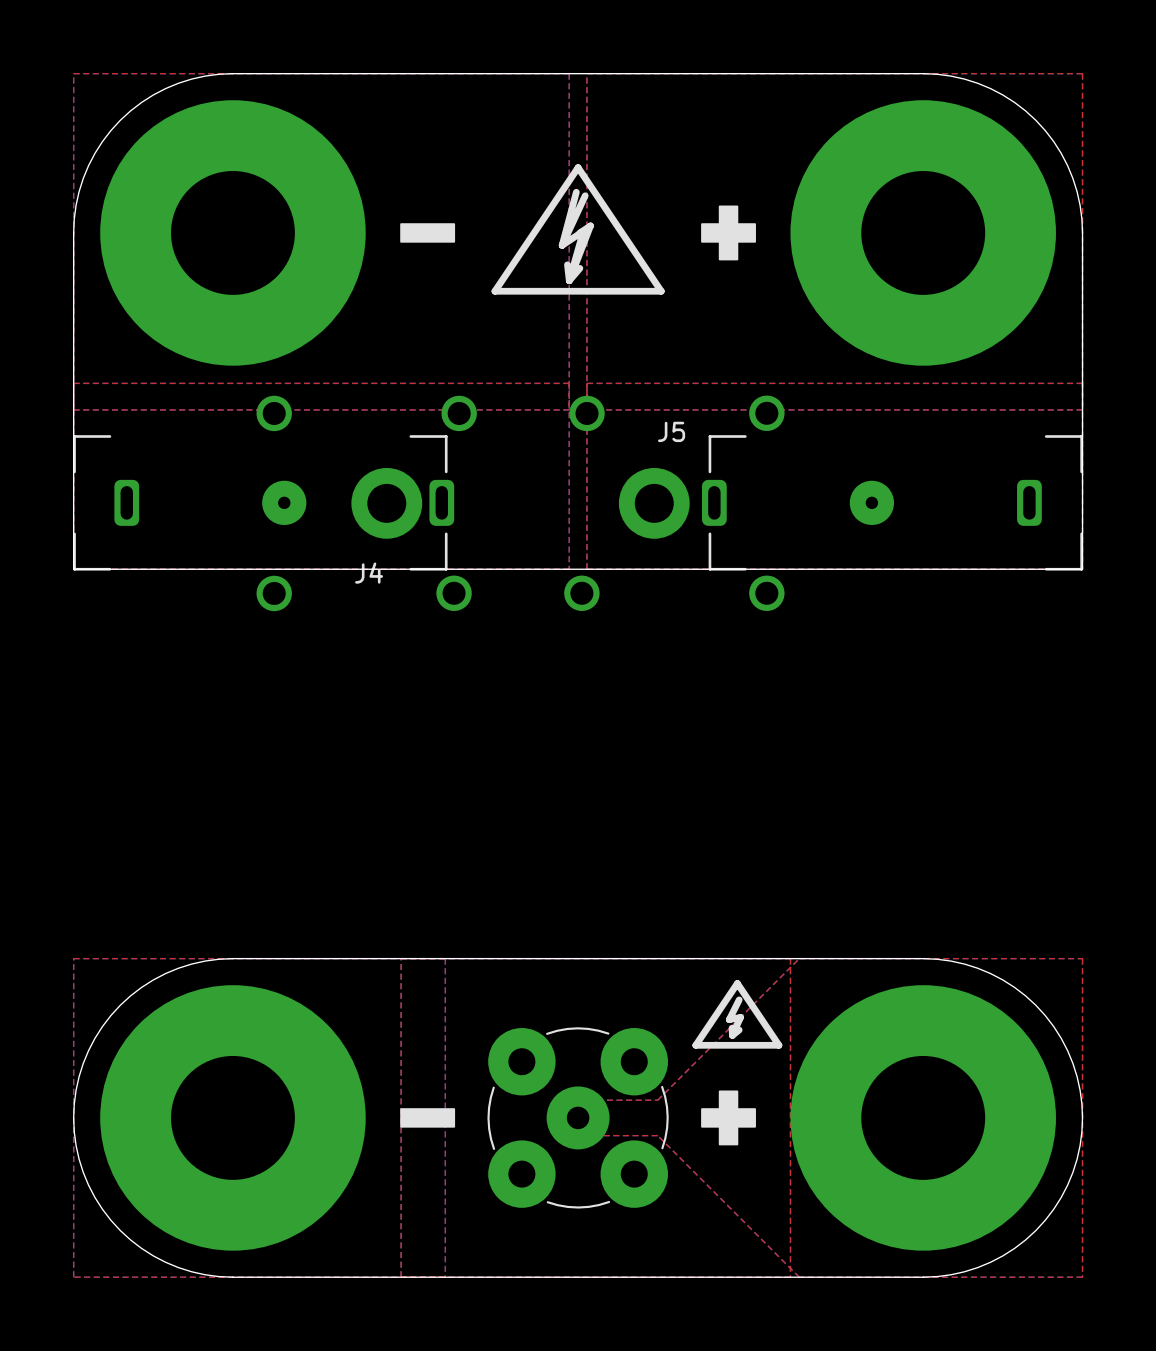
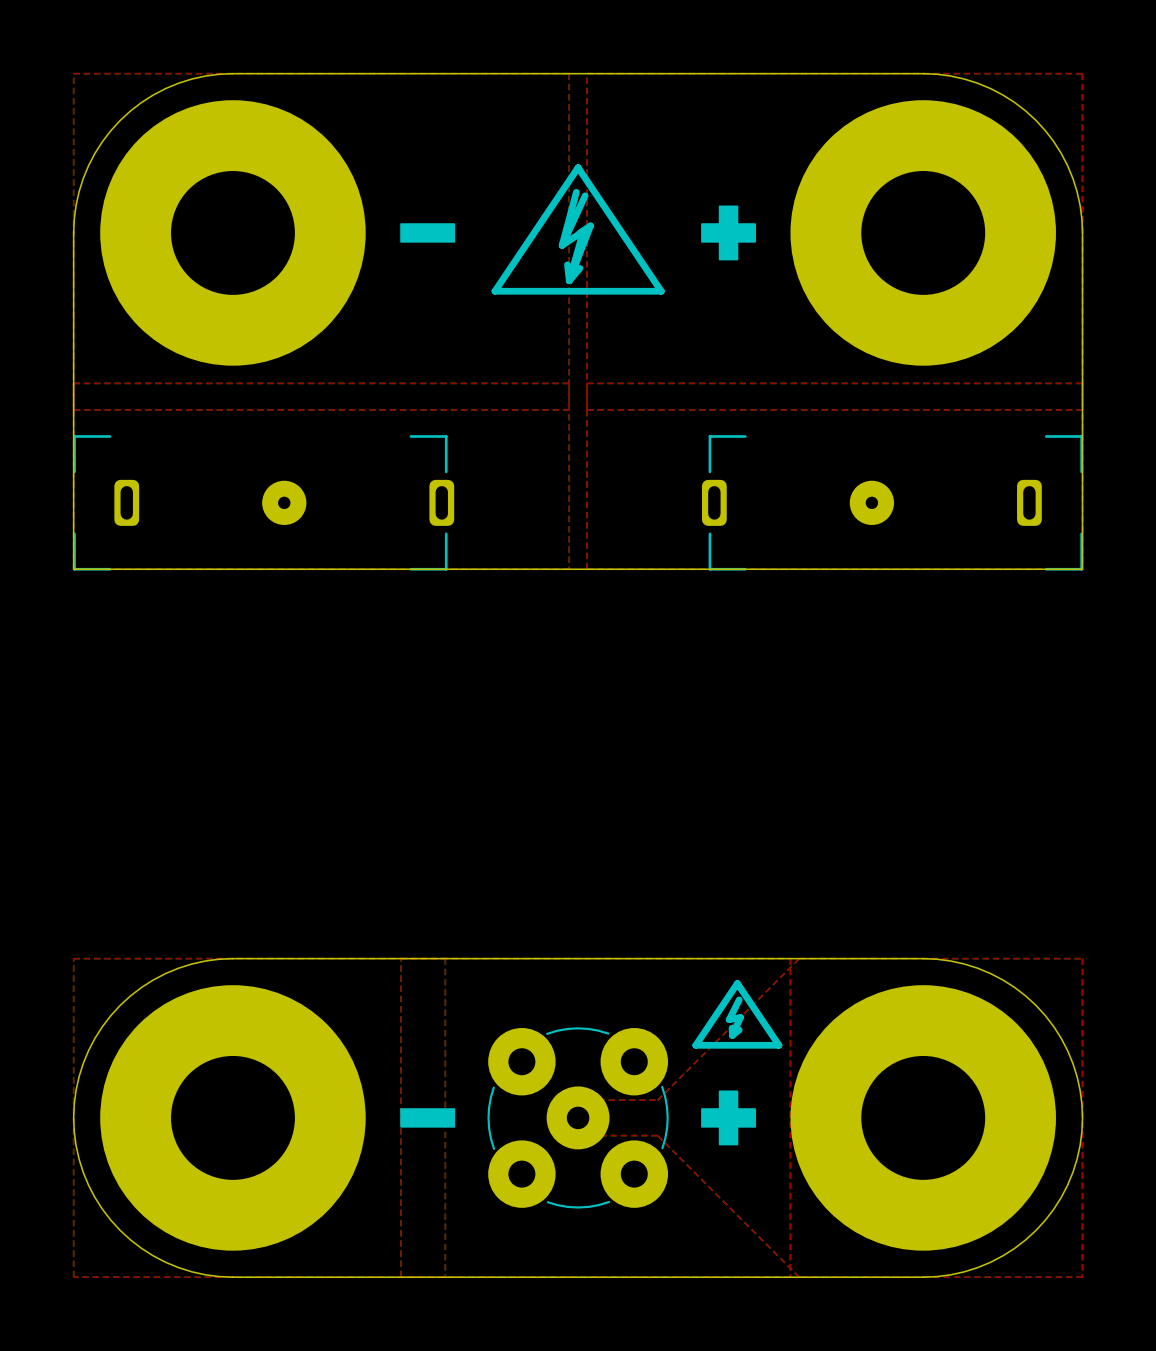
J4: (366, 503) -> none
J5: (674, 503) -> none

